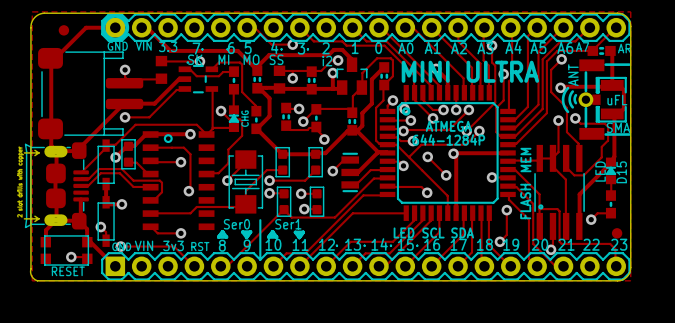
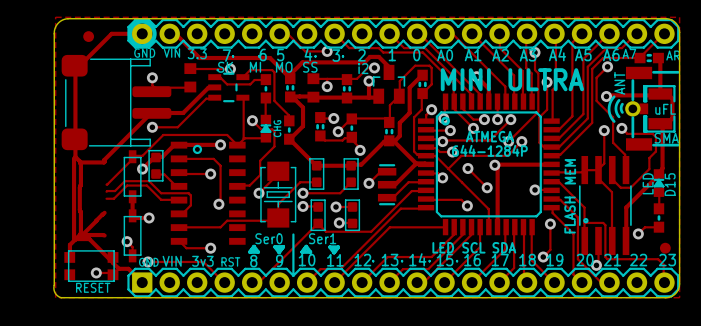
track: none -> (74, 158) (74, 239)
part: (56, 185) -> none
track: none -> (104, 212) (78, 239)
track: (81, 199) (79, 221) (87, 229) (87, 242) (90, 241) (115, 266) -> (74, 239) (89, 239) (118, 268) (128, 268) (142, 282)

